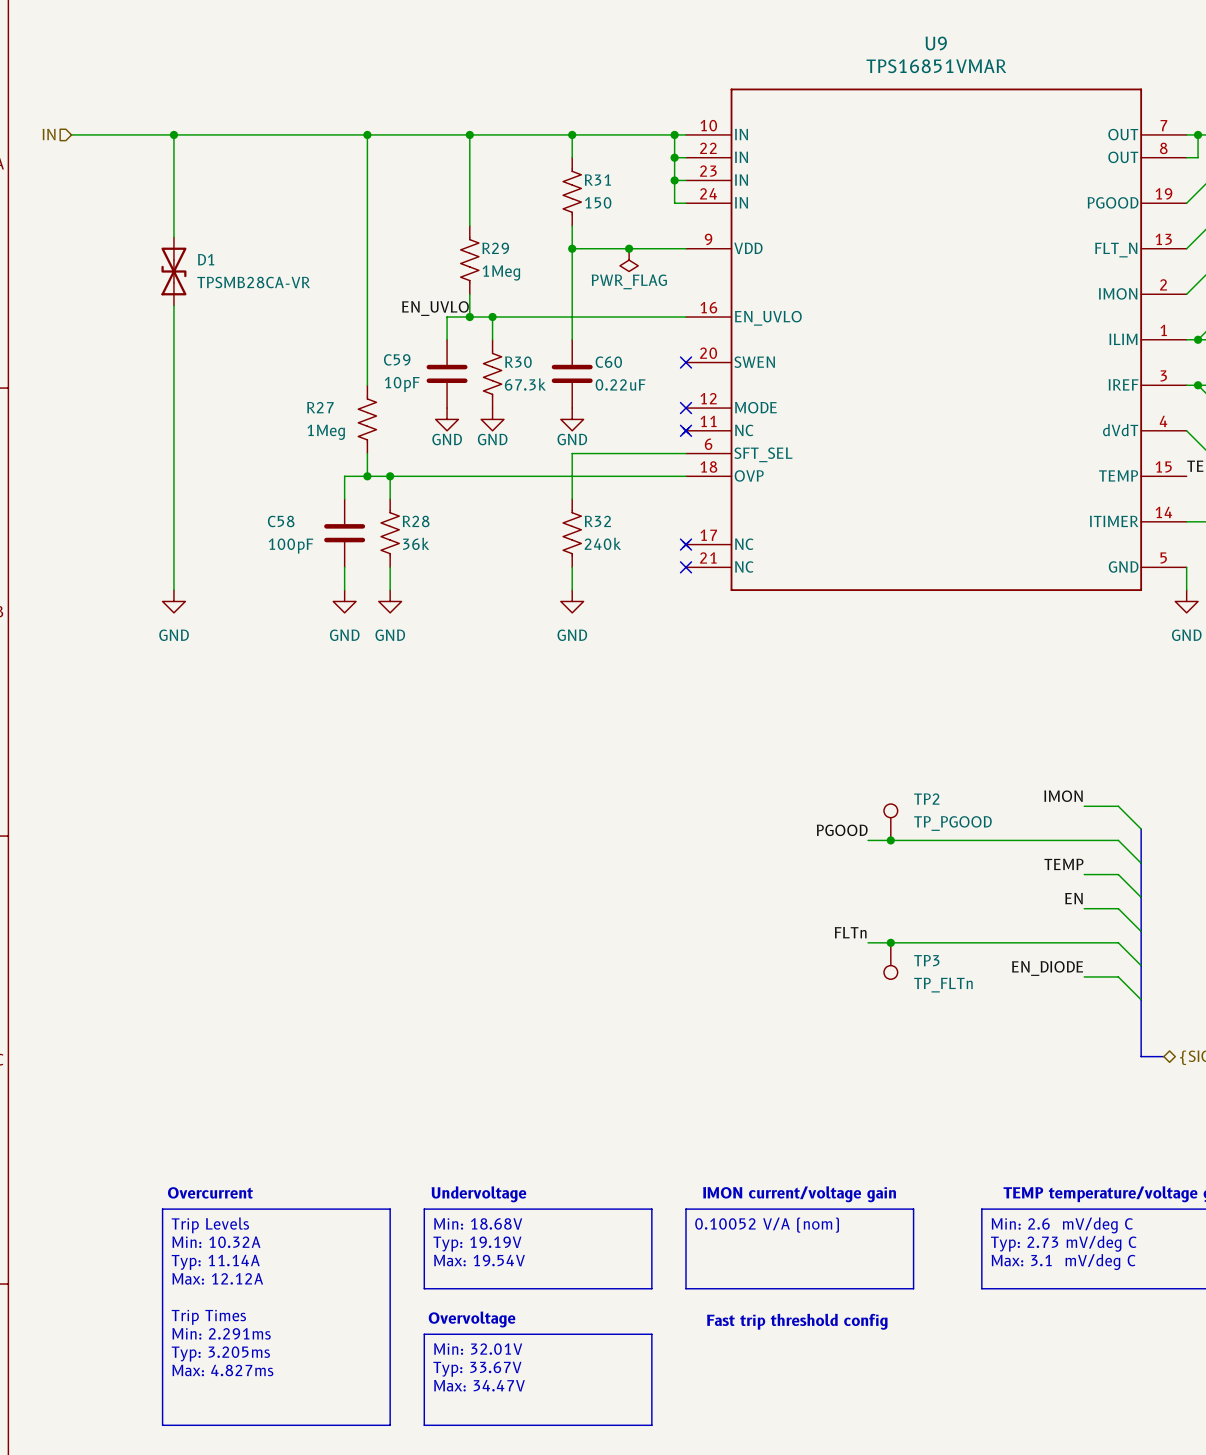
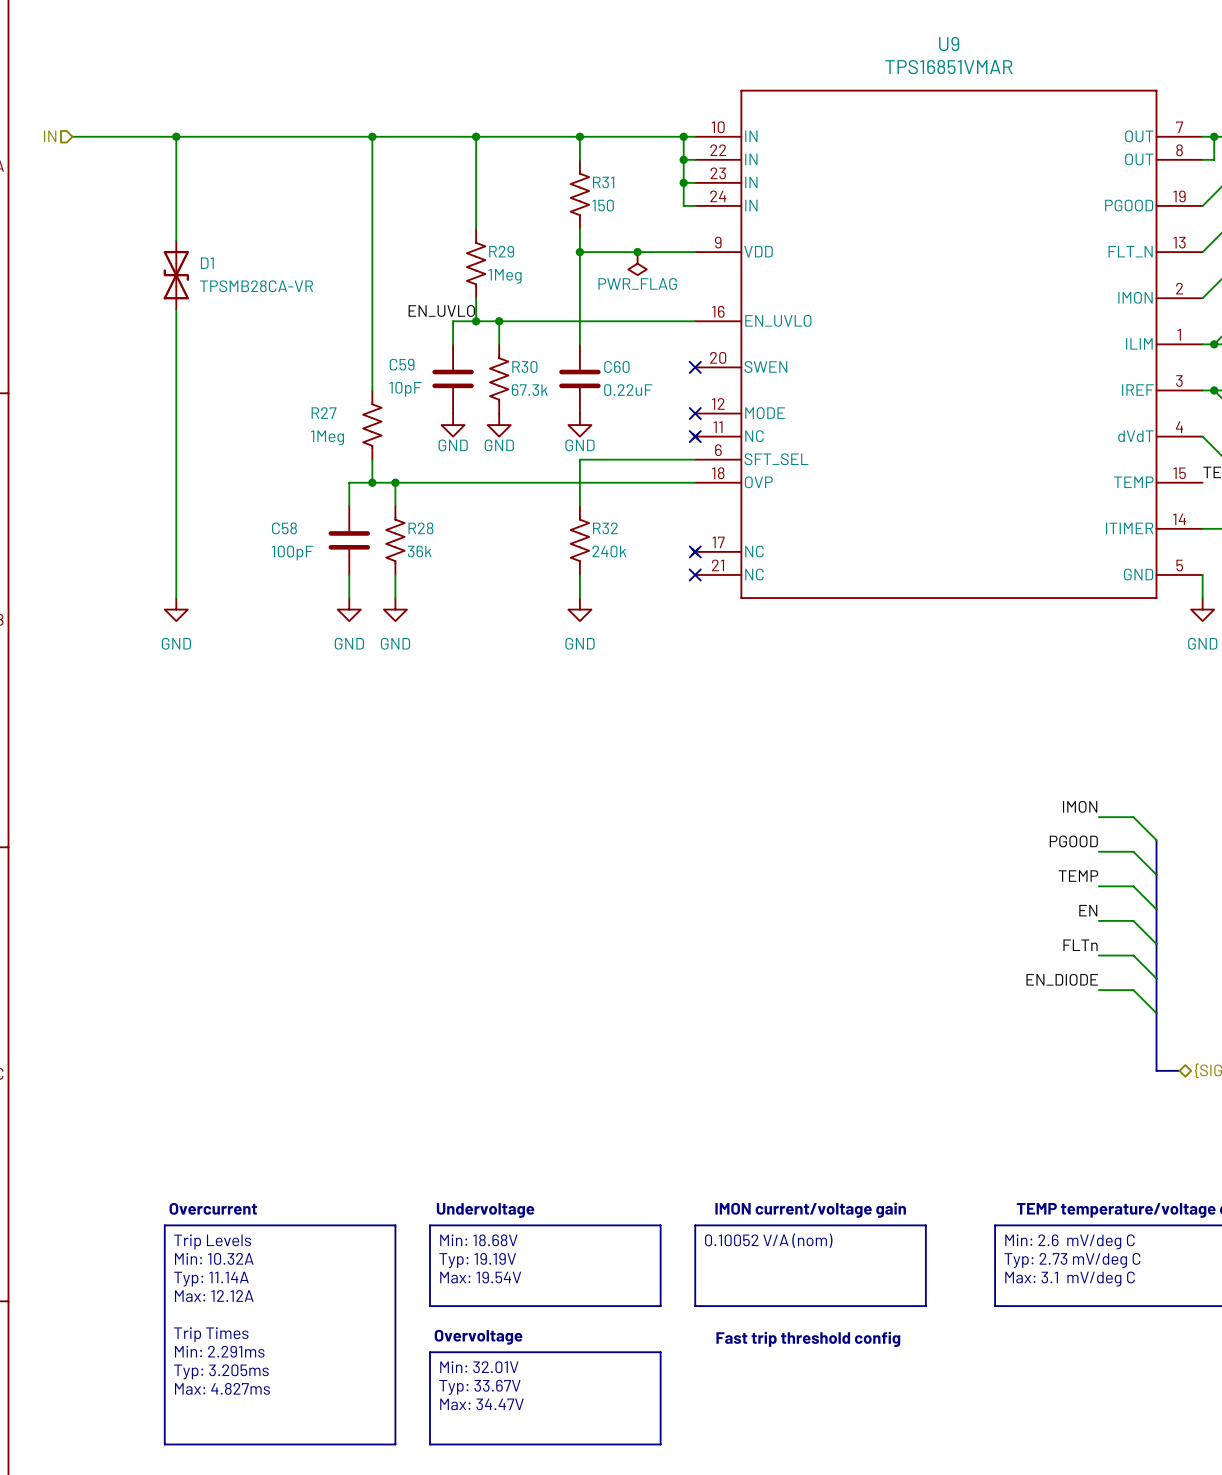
TP2: TP_PGOOD (890, 822) -> none
label position: PGOOD (842, 830) -> PGOOD (1073, 841)
wire: (868, 840) (1084, 840) -> none
junction: (890, 840) -> none
label position: FLTn (850, 932) -> FLTn (1080, 945)
wire: (868, 942) (1084, 942) -> none
junction: (890, 942) -> none
TP3: TP_FLTn (890, 961) -> none

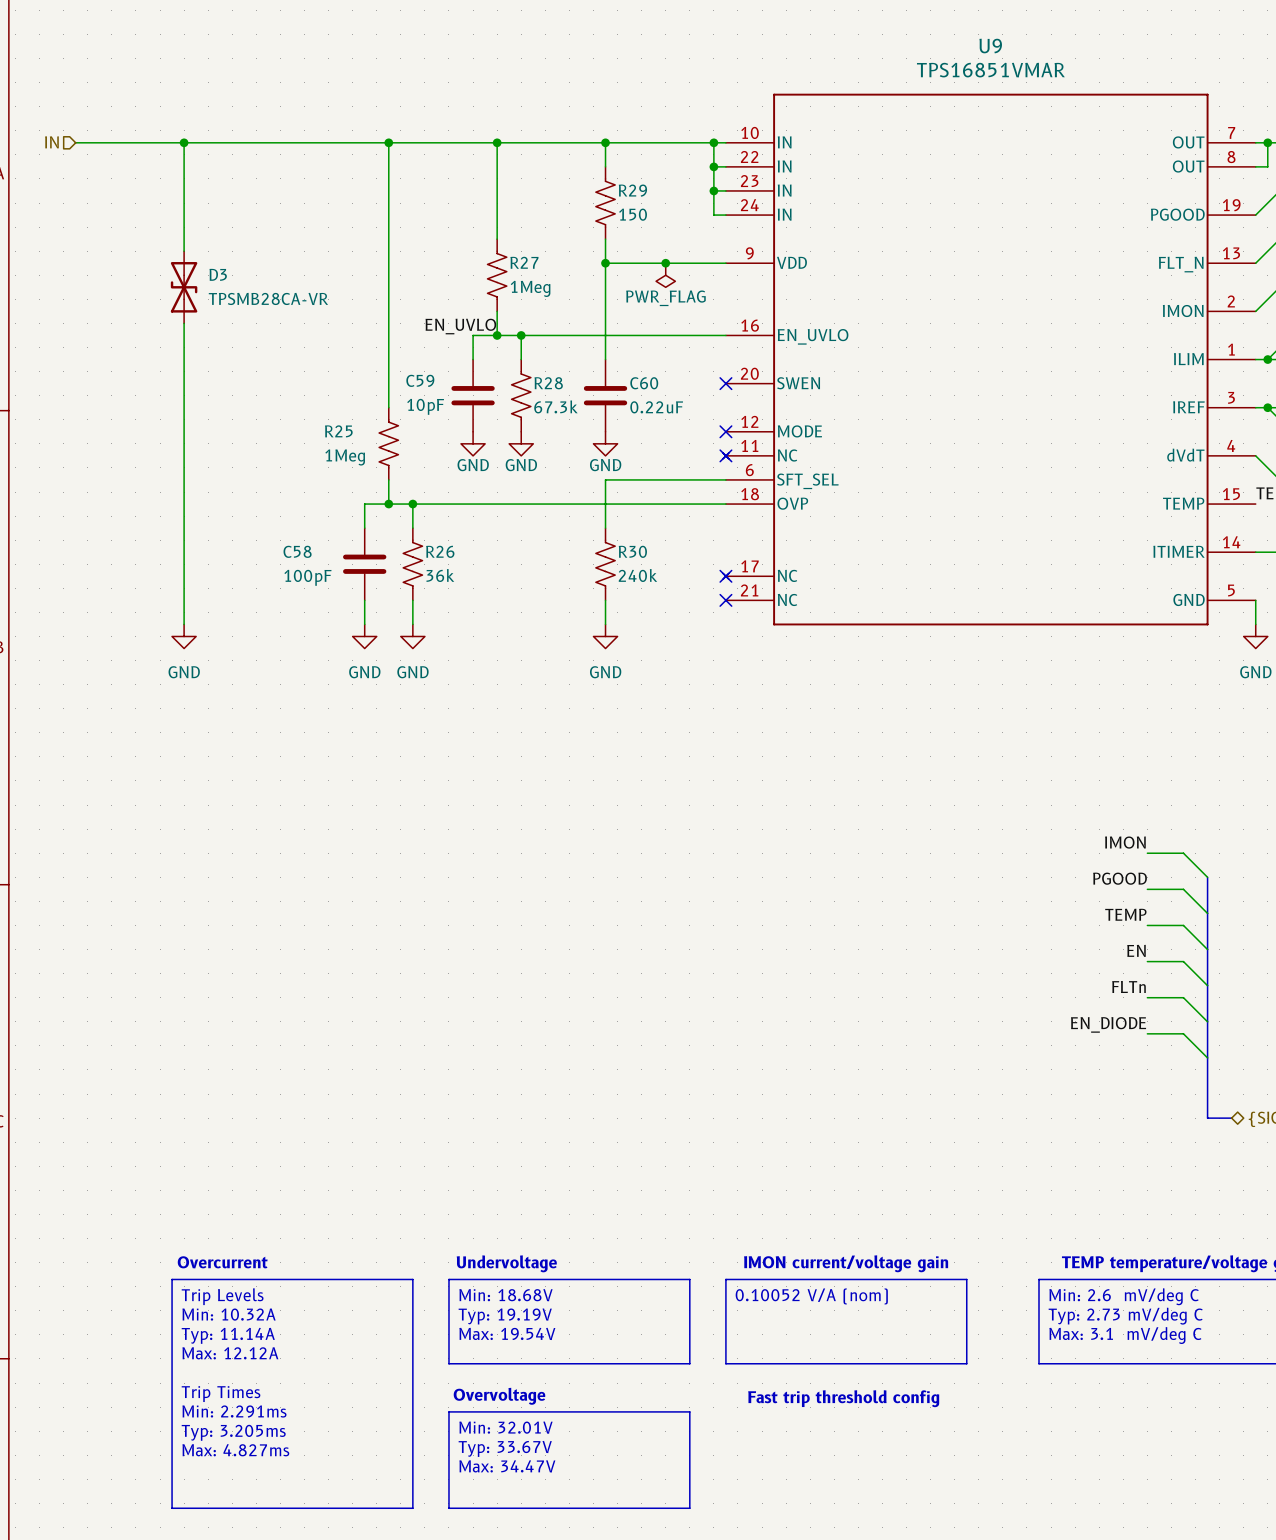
R31 name: R31 (603, 182) -> R29 (632, 190)
R29 name: R29 (501, 251) -> R27 (524, 262)
D1 name: D1 (207, 263) -> D3 (218, 274)
R30 name: R30 (524, 366) -> R28 (548, 383)
R27 name: R27 (324, 413) -> R25 (338, 431)
R28 name: R28 (420, 528) -> R26 (440, 551)
R32 name: R32 (605, 528) -> R30 (632, 551)

